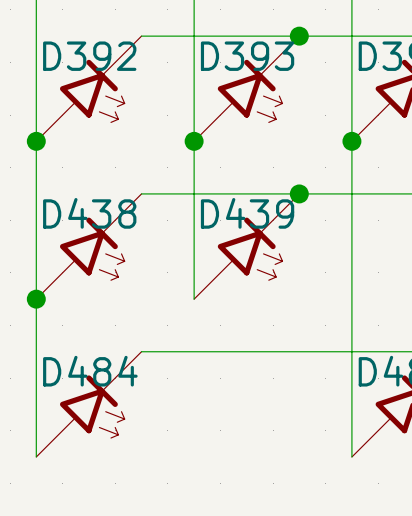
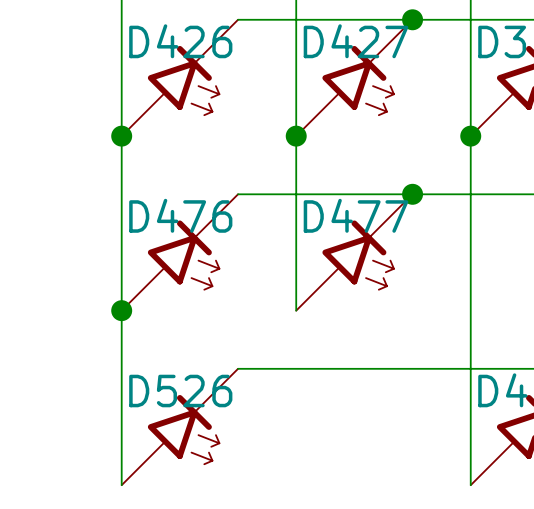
D392 name: D392 (89, 56) -> D426 (180, 41)
D393 name: D393 (247, 56) -> D427 (356, 41)
D438 name: D438 (89, 213) -> D476 (180, 215)
D439 name: D439 (247, 213) -> D477 (356, 215)
D484 name: D484 (90, 371) -> D526 (180, 391)

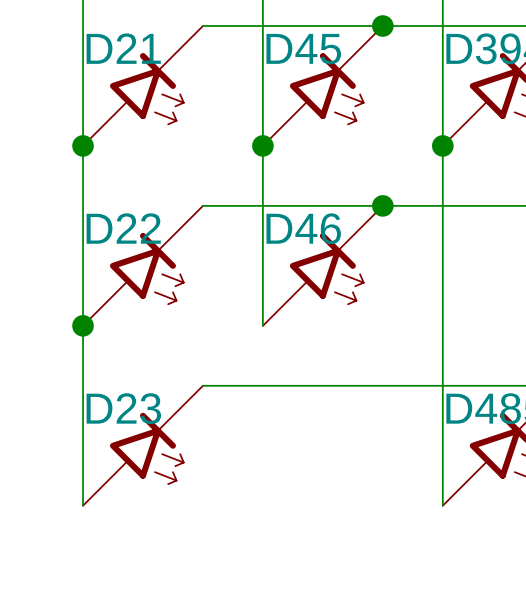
D426 name: D426 (180, 41) -> D21 (123, 48)
D427 name: D427 (356, 41) -> D45 (303, 49)
D476 name: D476 (180, 215) -> D22 (123, 228)
D477 name: D477 (356, 215) -> D46 (303, 228)
D526 name: D526 (180, 391) -> D23 (123, 408)

